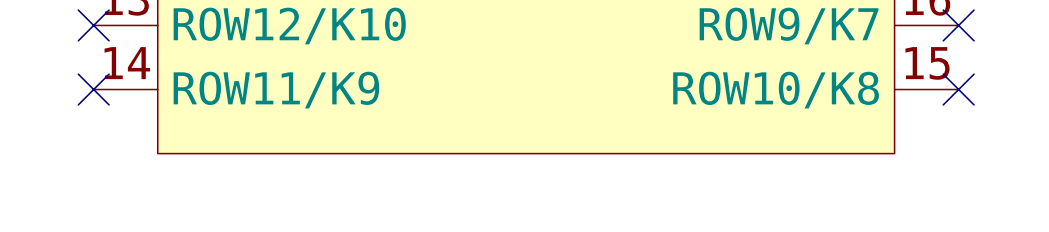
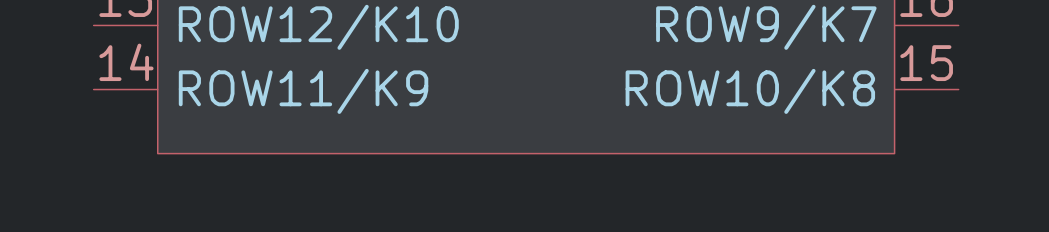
no-connect mark: (93, 25) -> none
no-connect mark: (958, 25) -> none
no-connect mark: (93, 89) -> none
no-connect mark: (958, 89) -> none

